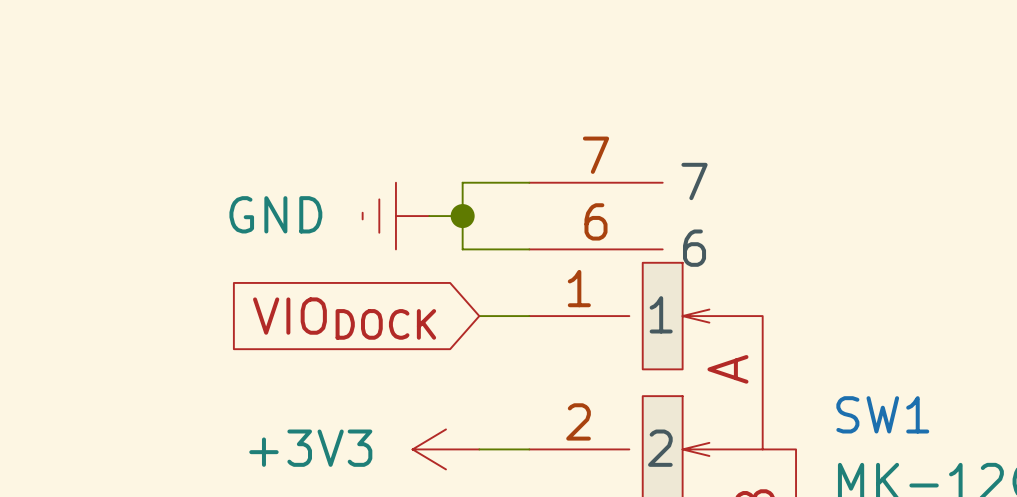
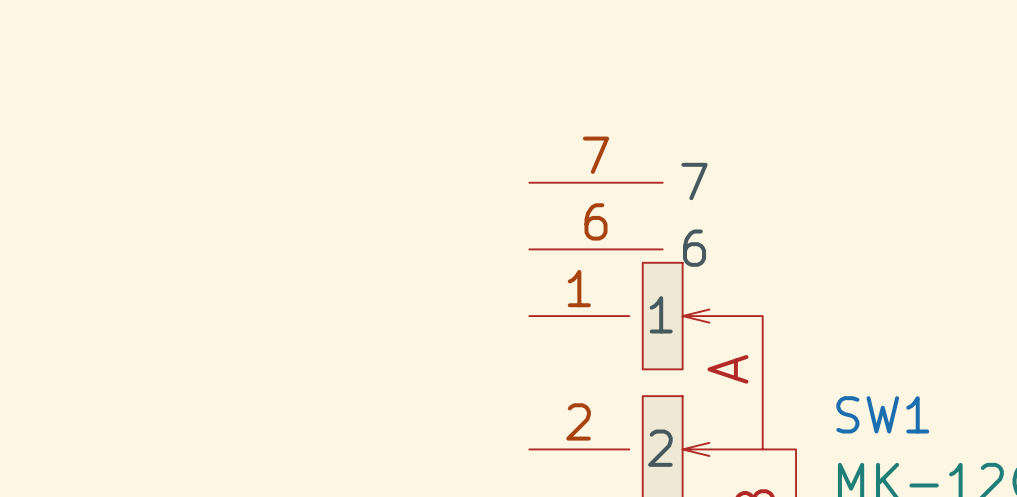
wire: (529, 182) (462, 182) (462, 249) (529, 249) -> none
power symbol: GND (395, 216) -> none
wire: (429, 216) (462, 216) -> none
junction: (462, 216) -> none
wire: (479, 316) (529, 316) -> none
global label: VIODOCK (344, 318) -> none
power symbol: +3V3 (445, 449) -> none
wire: (479, 449) (529, 449) -> none

